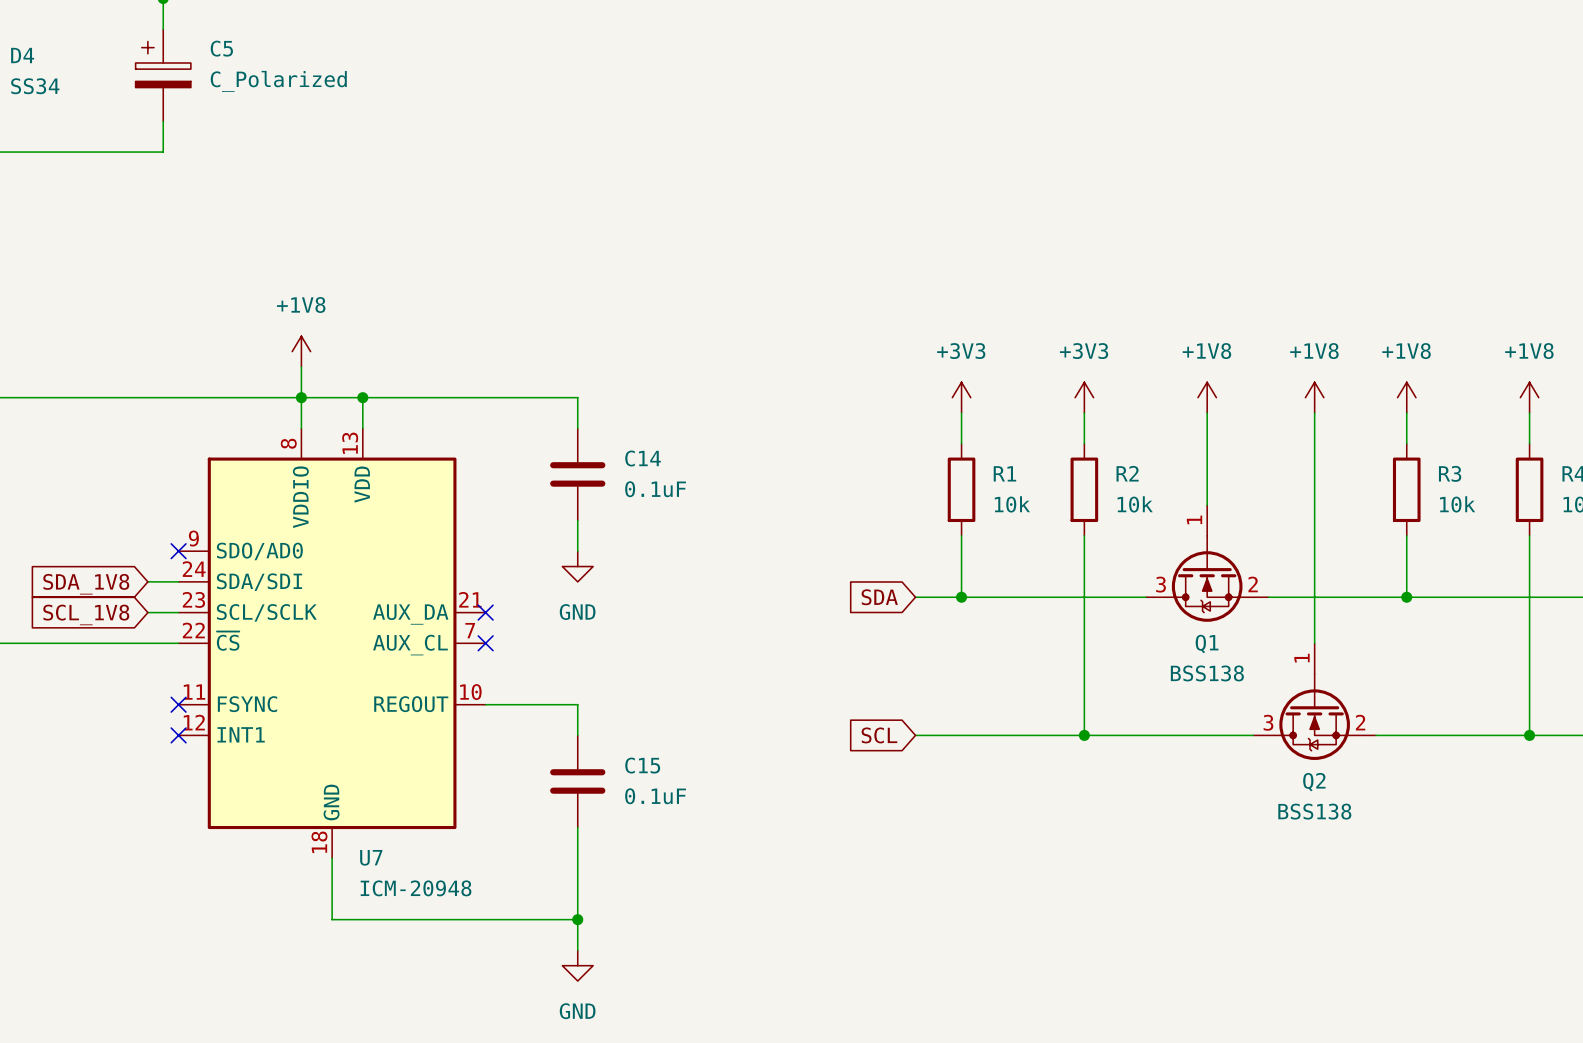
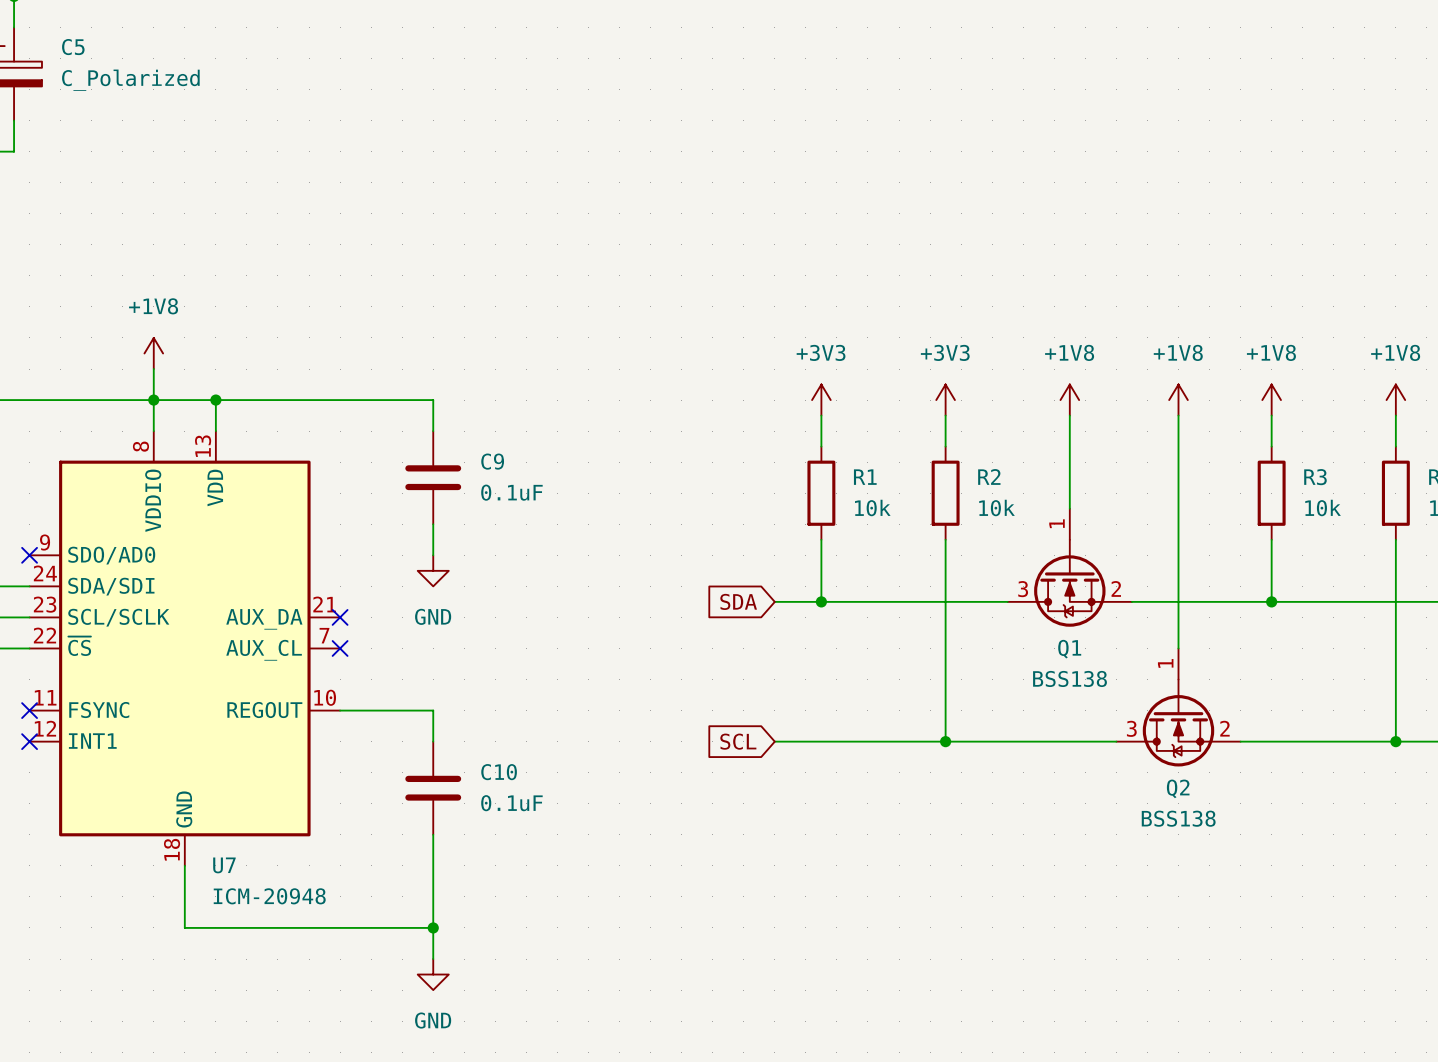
C14 name: C14 (643, 458) -> C9 (492, 461)
C15 name: C15 (642, 765) -> C10 (499, 772)

